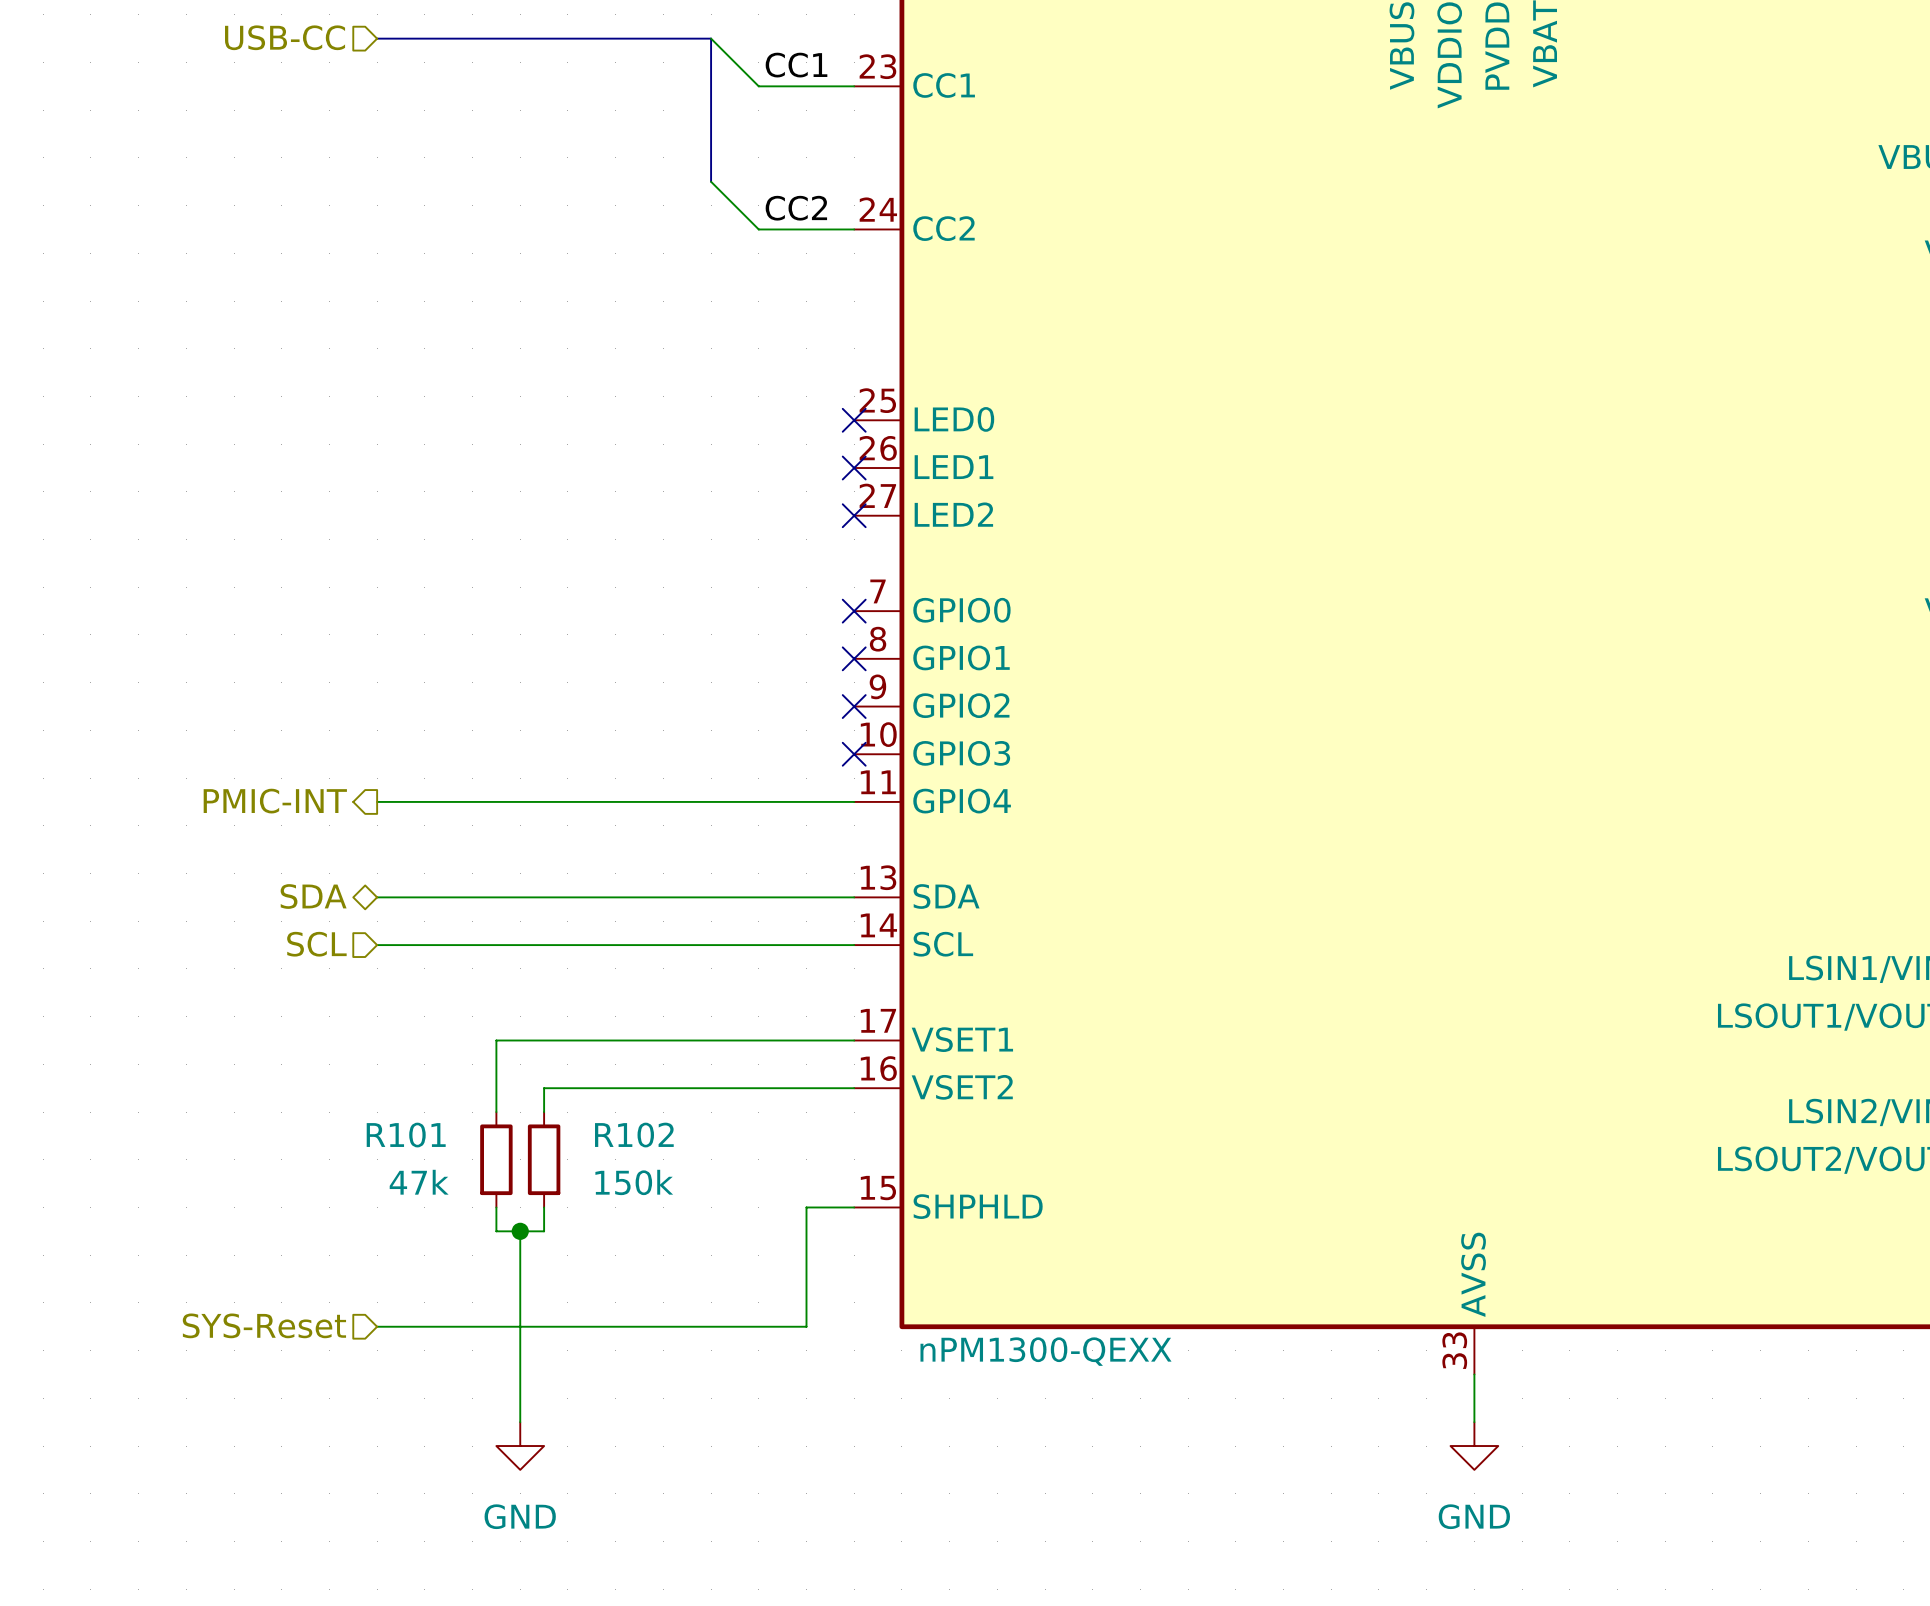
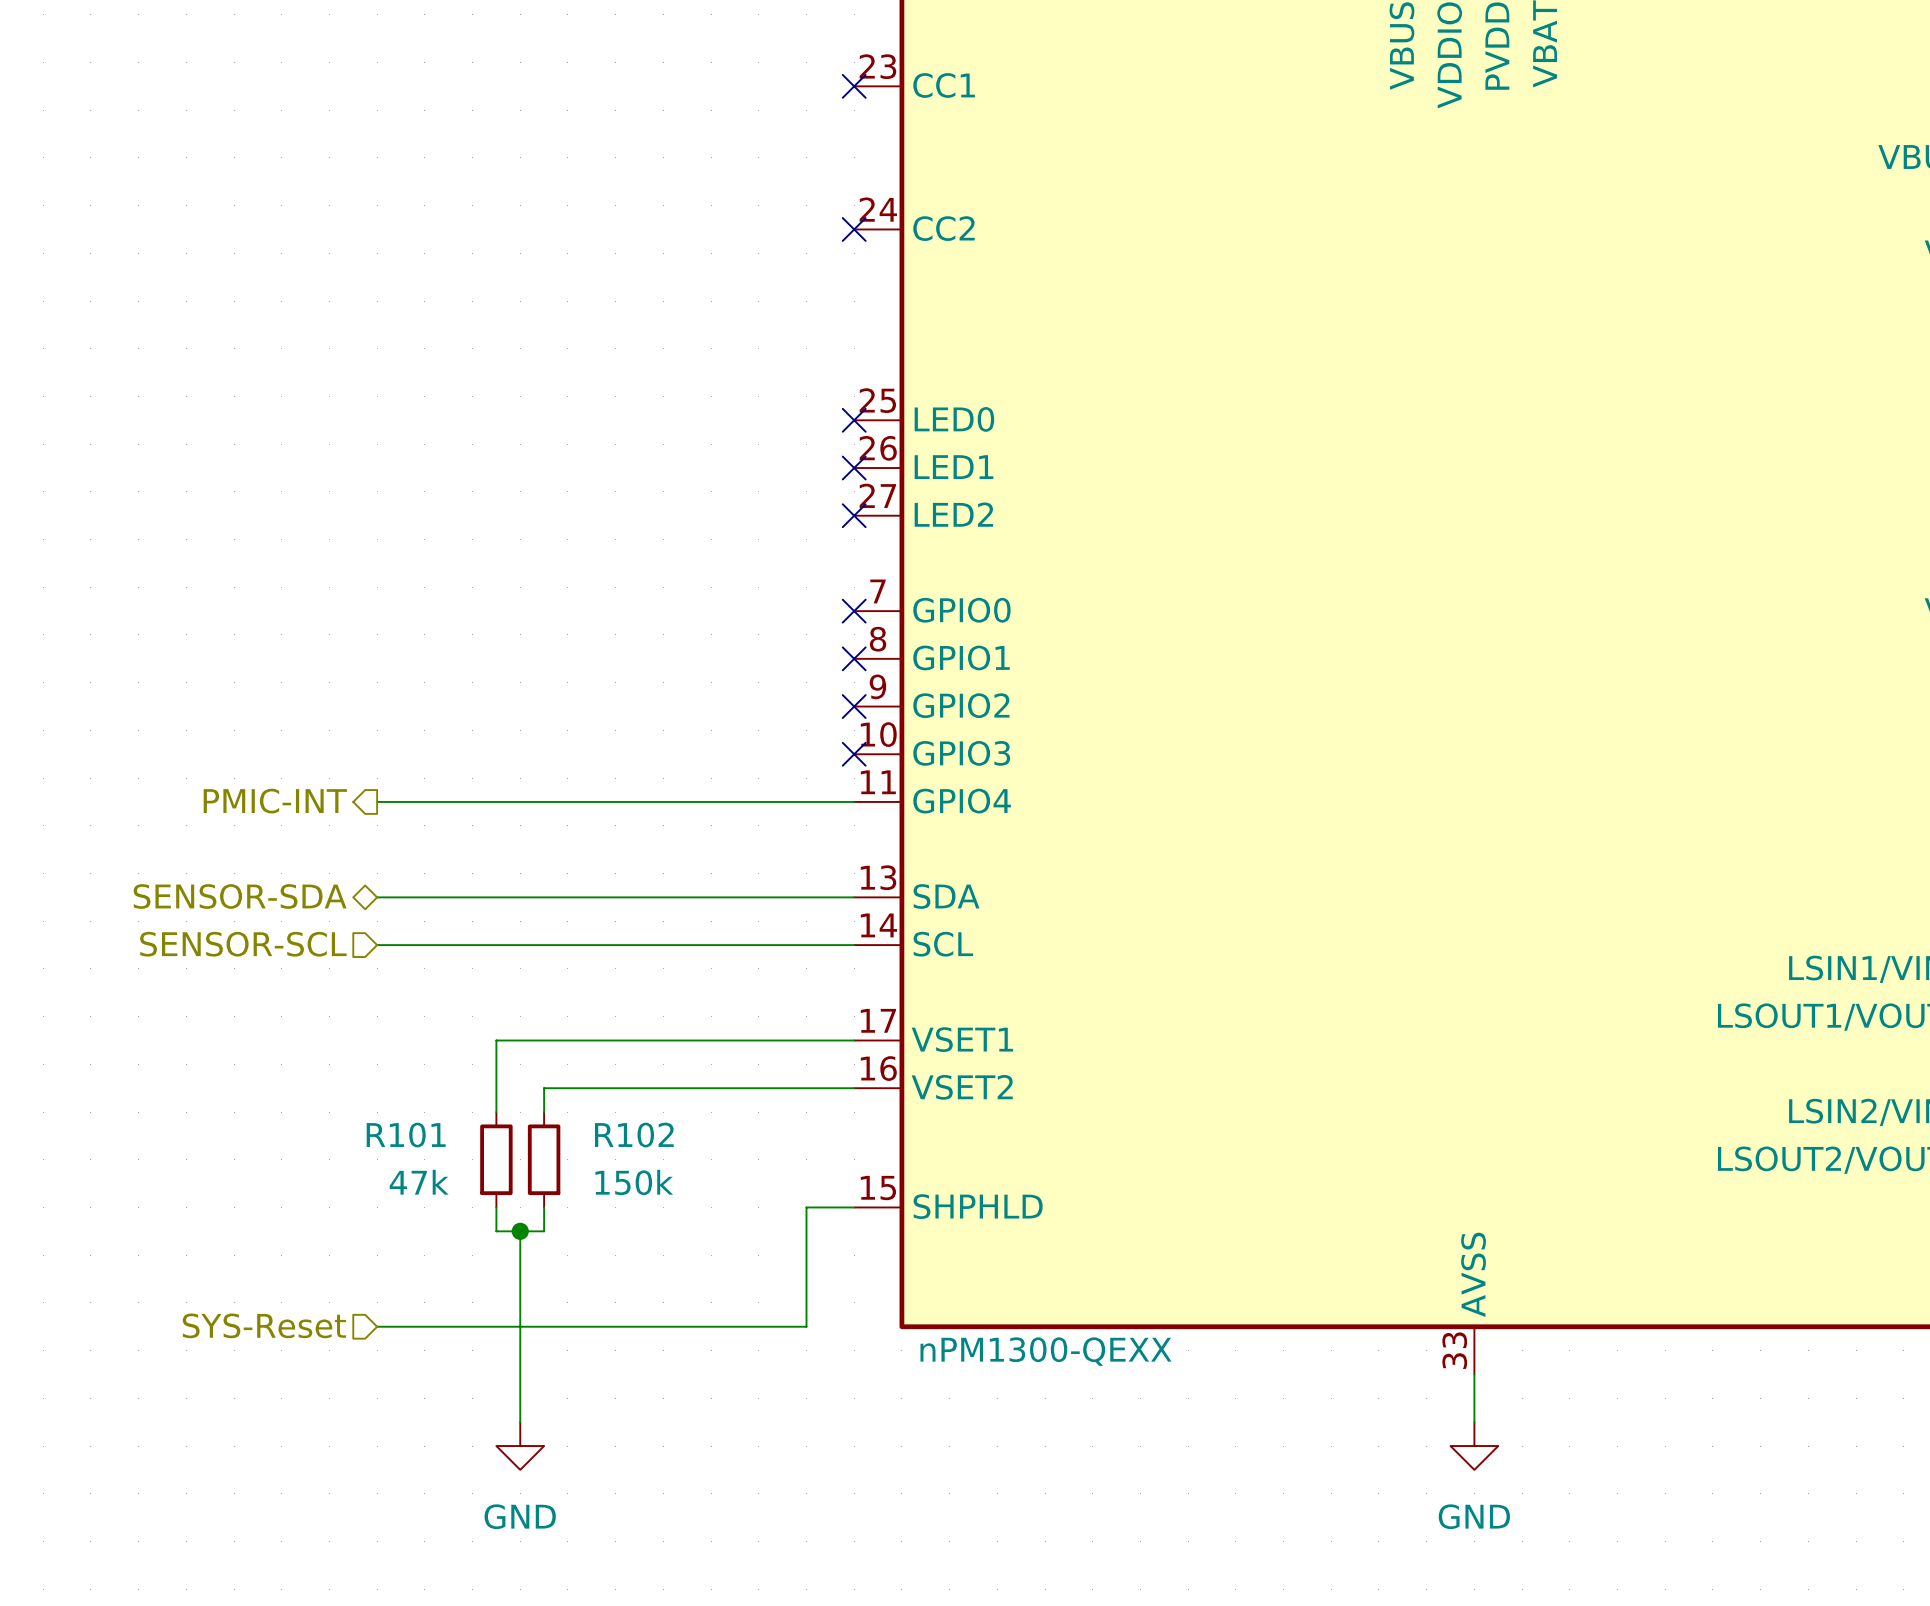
hierarchical label: USB-CC (285, 37) -> none
bus: (377, 38) (711, 38) (711, 181) -> none
wire: (711, 38) (758, 86) (854, 86) -> none
label: CC1 (796, 65) -> none
no-connect mark: none -> (854, 86)
wire: (711, 181) (758, 229) (854, 229) -> none
label: CC2 (796, 208) -> none
no-connect mark: none -> (854, 229)
hierarchical label: SDA (313, 896) -> SENSOR-SDA (240, 896)
hierarchical label: SCL (316, 944) -> SENSOR-SCL (243, 944)

